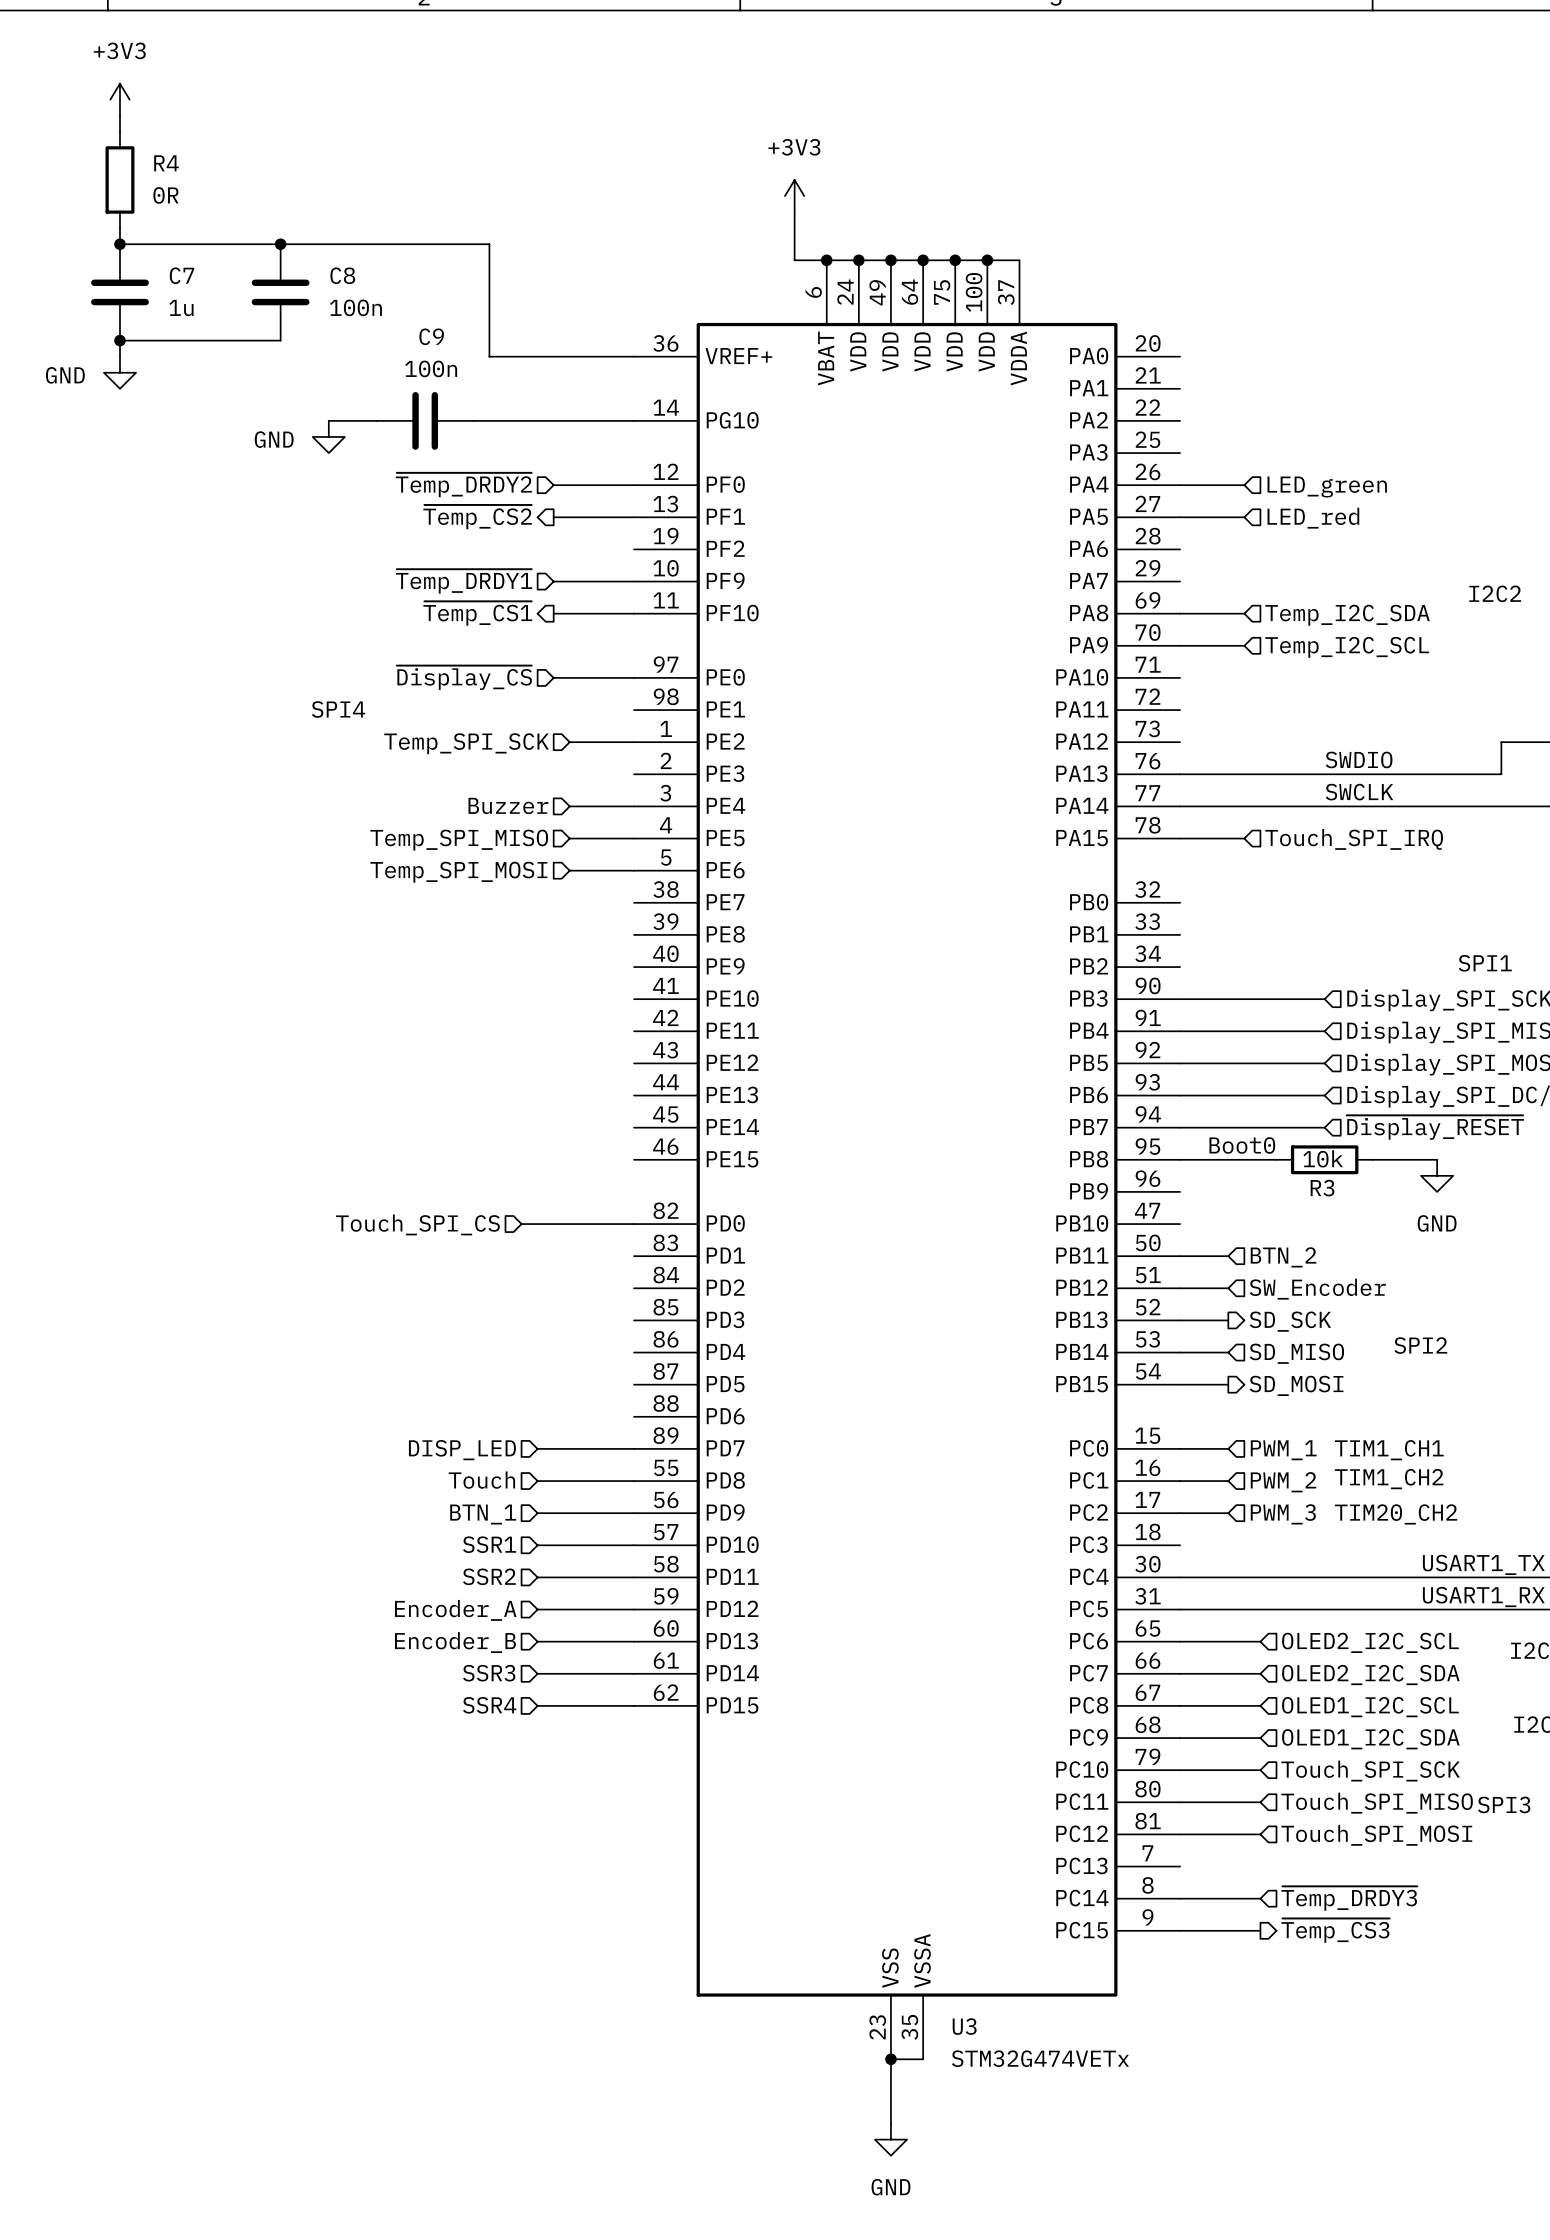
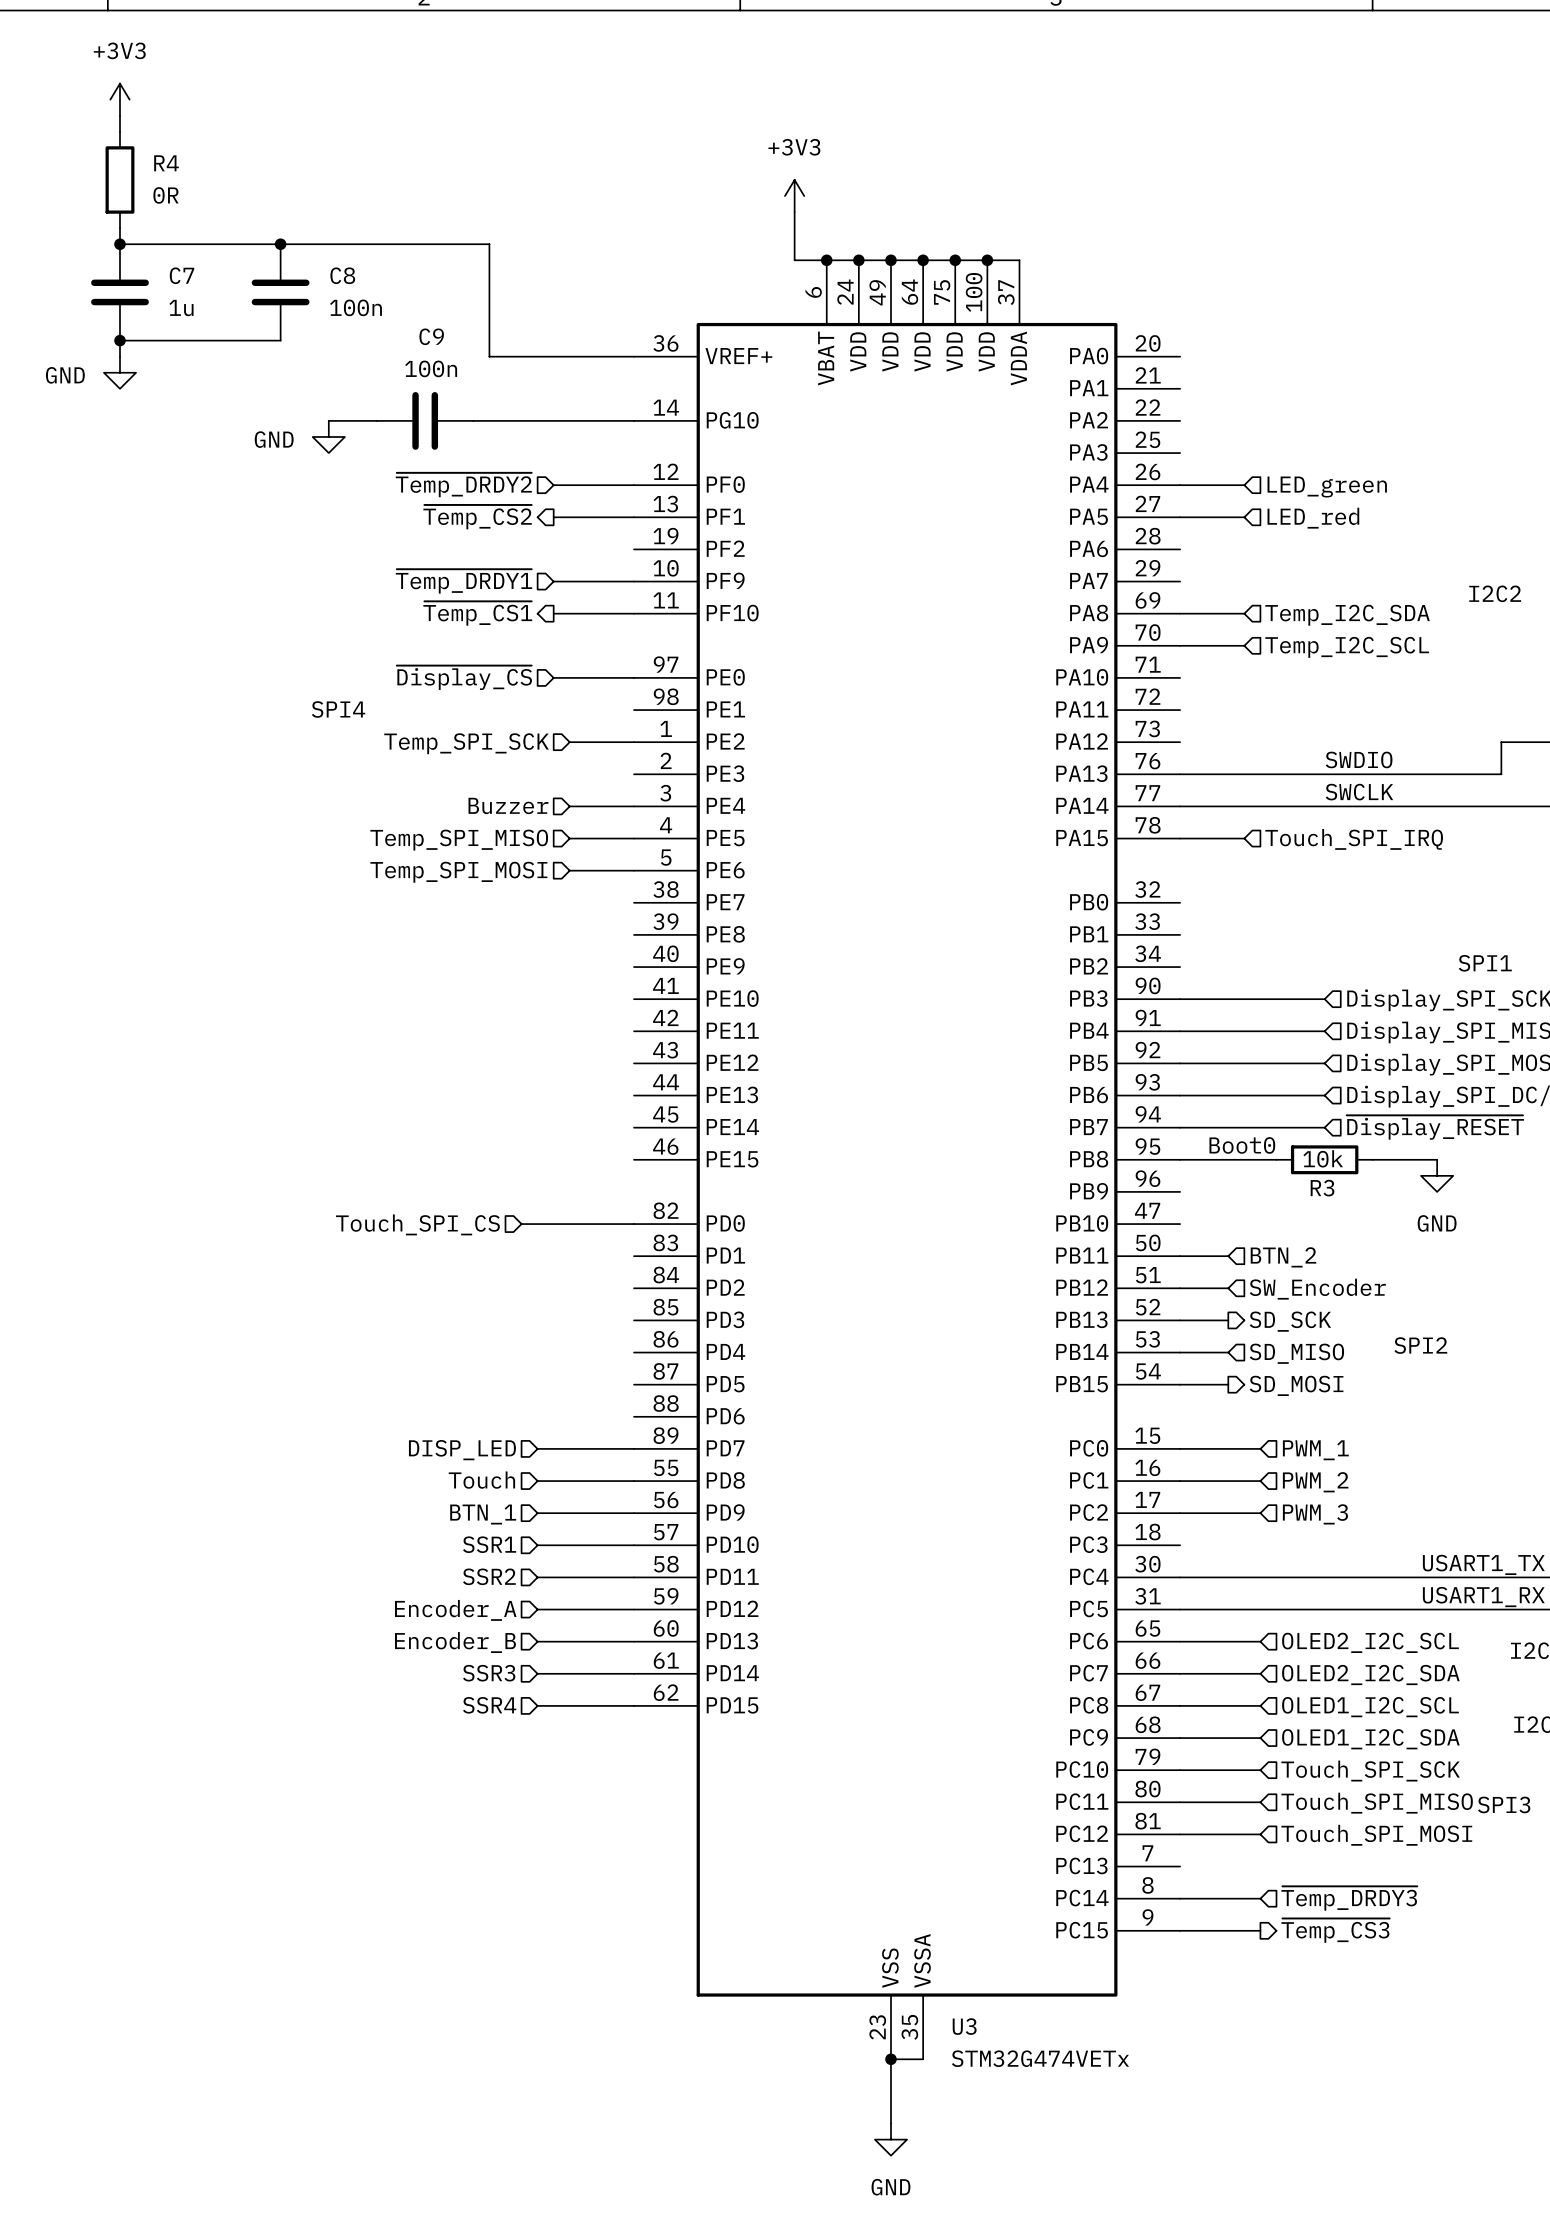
wire: none -> (1228, 1448) (1260, 1448)
hierarchical label position: PWM_1 (1283, 1450) -> PWM_1 (1315, 1450)
text: TIM1_CH1 (1389, 1450) -> none
text: TIM1_CH2 (1389, 1479) -> none
wire: none -> (1228, 1481) (1260, 1481)
hierarchical label position: PWM_2 (1283, 1482) -> PWM_2 (1315, 1482)
wire: none -> (1228, 1513) (1260, 1513)
hierarchical label position: PWM_3 (1283, 1514) -> PWM_3 (1315, 1514)
text: TIM20_CH2 (1396, 1514) -> none

